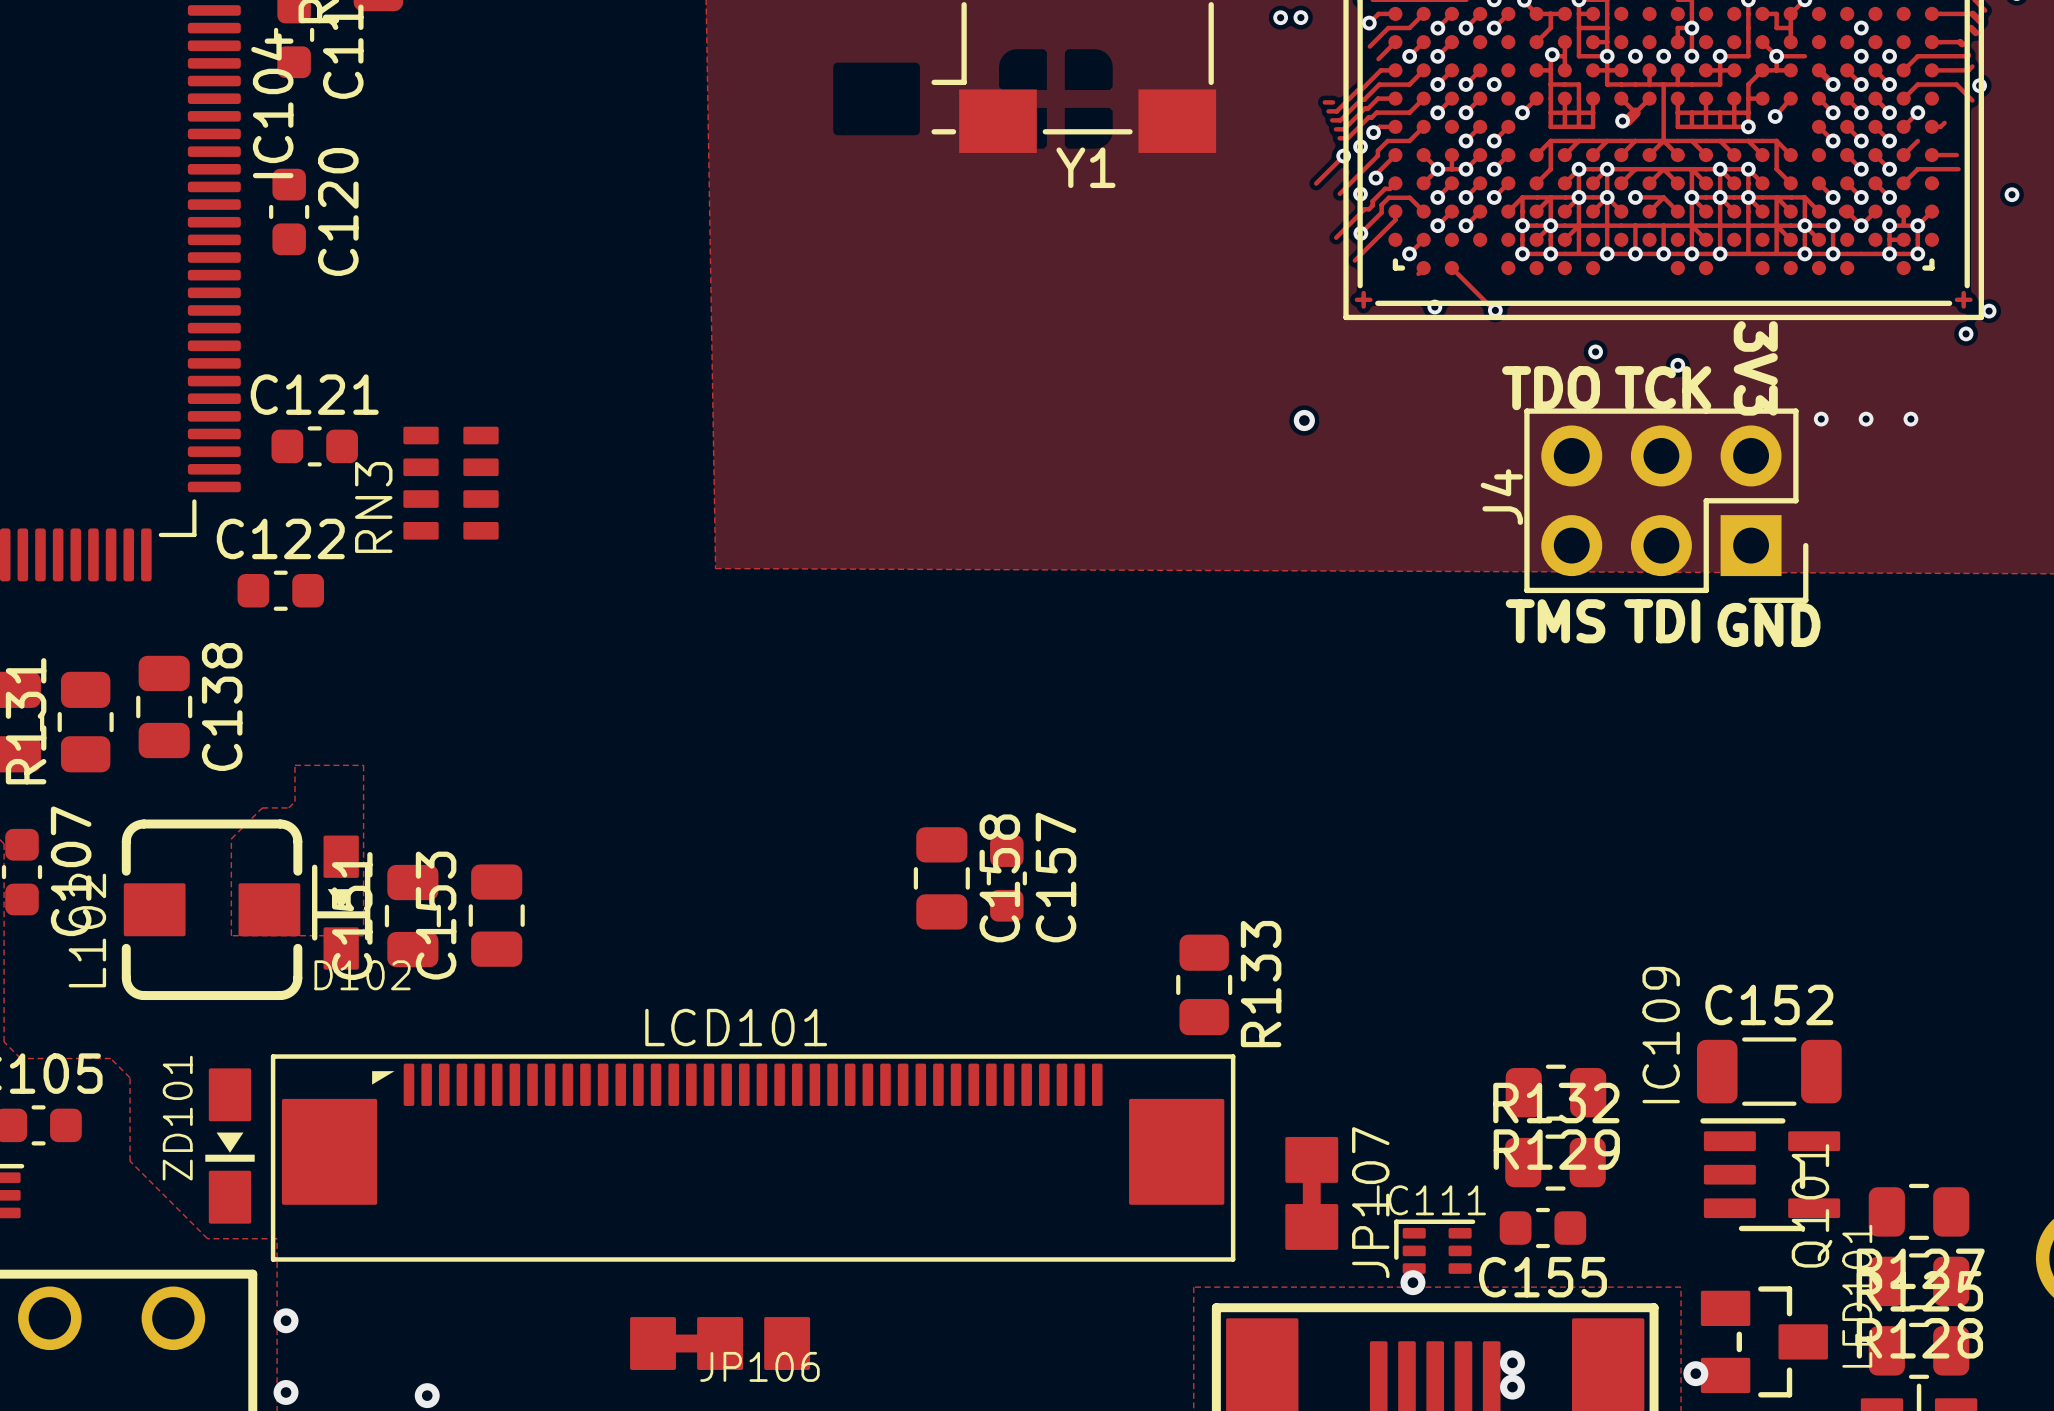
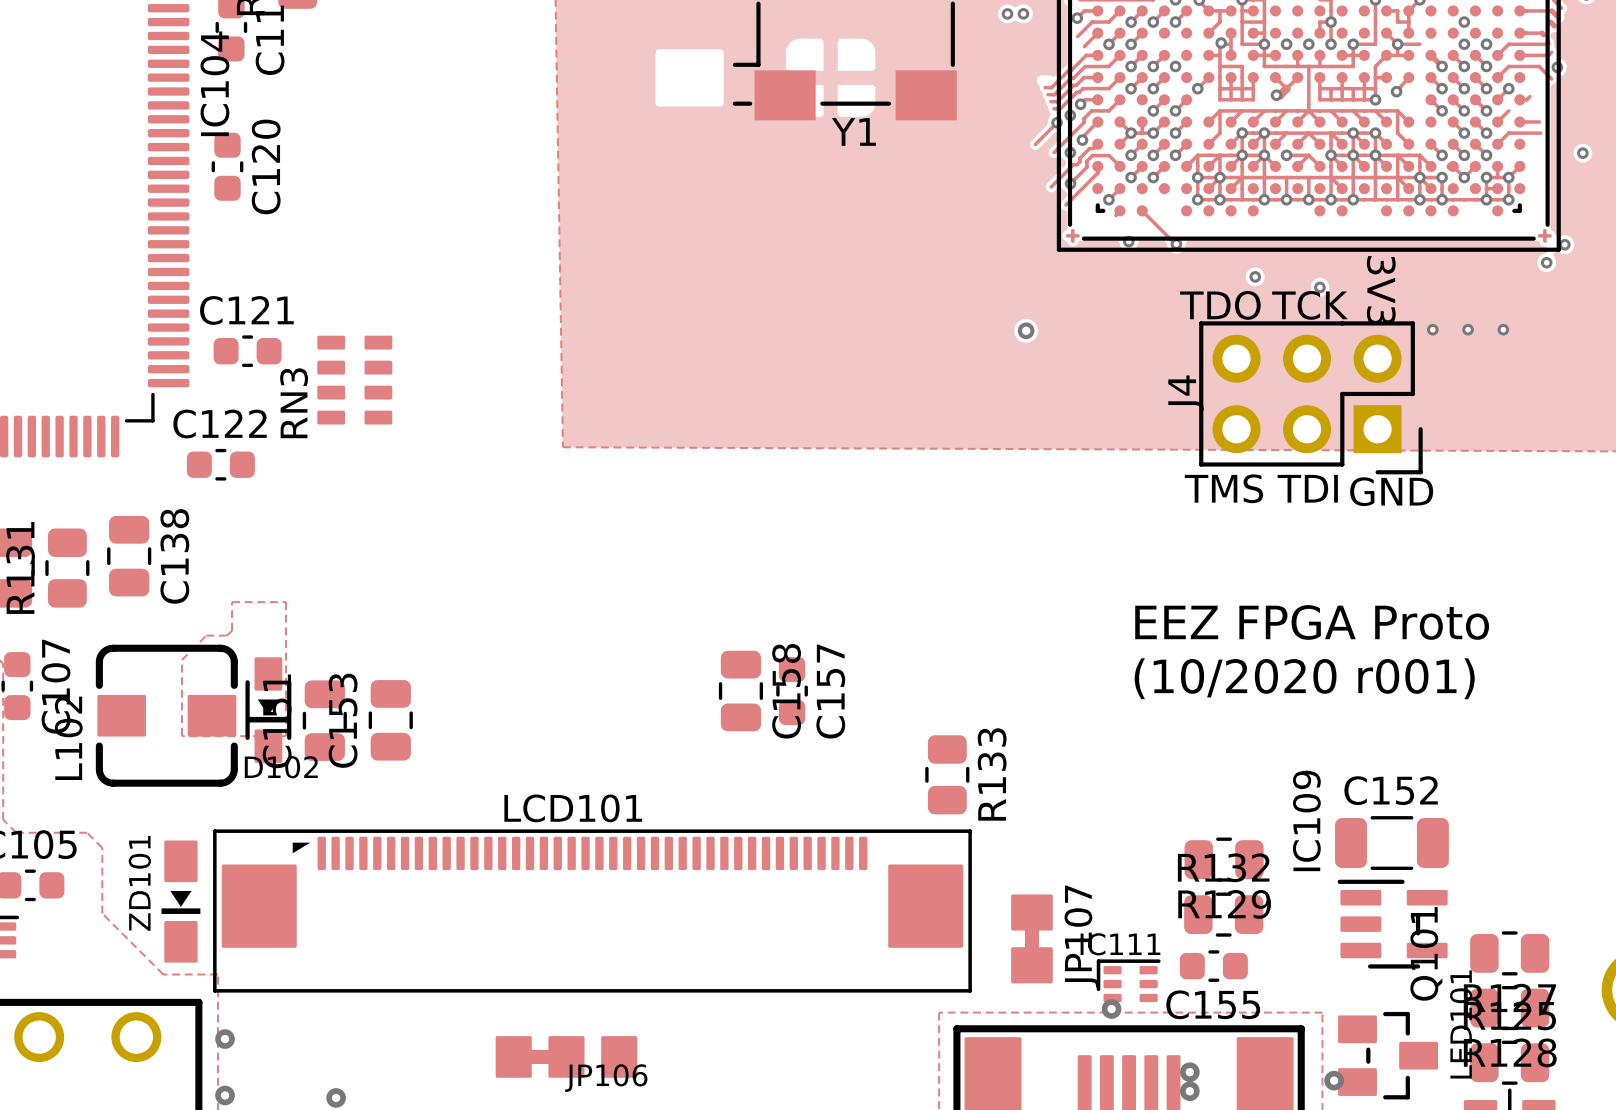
track: (1324, 102) (1333, 102) -> none
text: none -> EEZ FPGA Proto (1312, 622)
text: none -> (10/2020 r001) (1304, 678)

